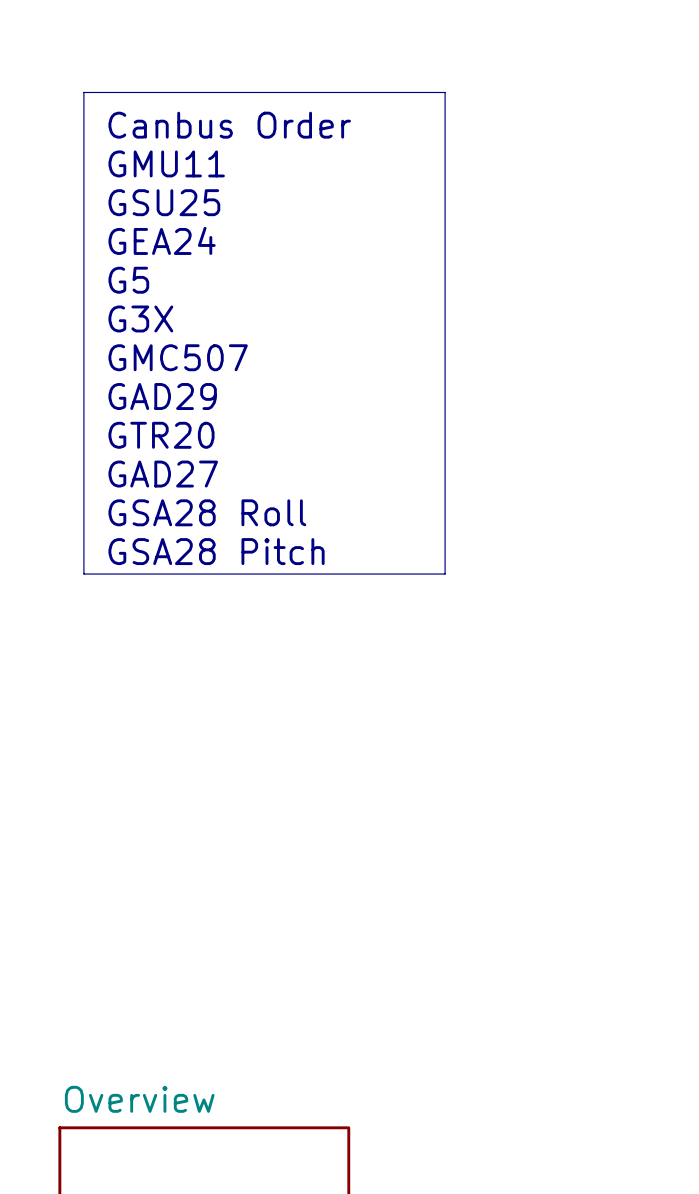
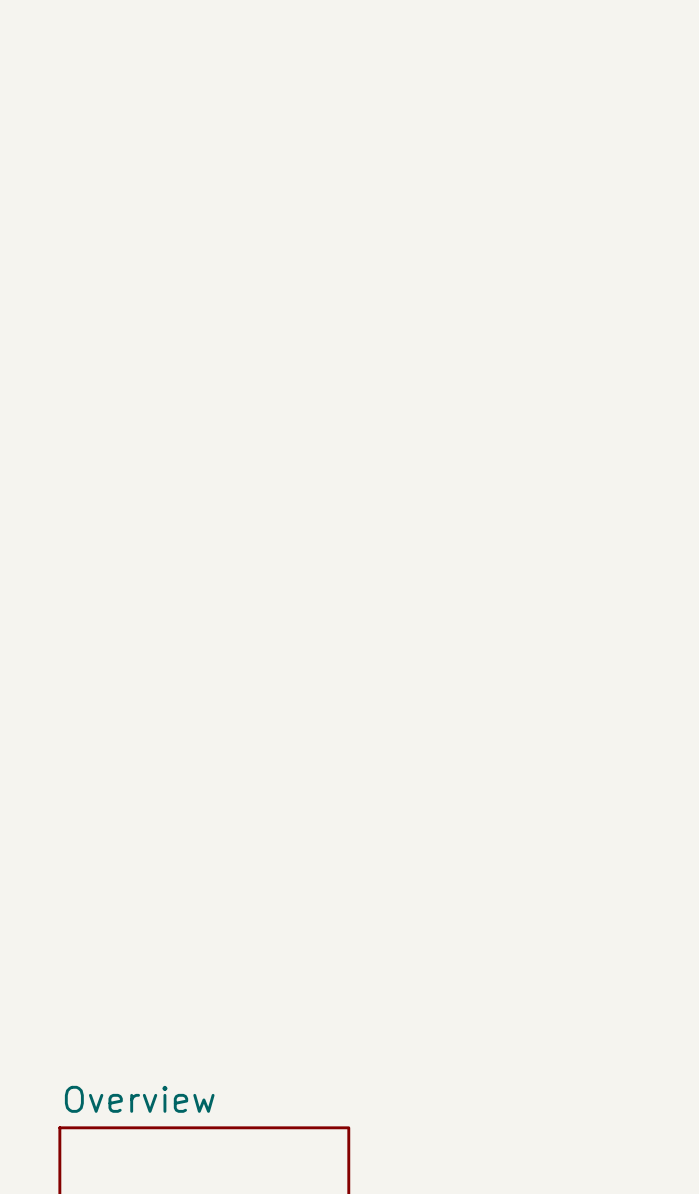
line: (83, 92) (445, 92) (445, 574) (83, 574) (83, 92) -> none
text: Canbus Order (229, 125) -> none
text: GMU11 (166, 163) -> none
text: GSU25 (164, 202) -> none
text: GEA24 (162, 240) -> none
text: G5 (128, 280) -> none
text: G3X (140, 318) -> none
text: GMC507 (178, 357) -> none
text: GAD29 (162, 396) -> none
text: GTR20 (161, 435) -> none
text: GAD27 (163, 474) -> none
text: GSA28 Roll (207, 512) -> none
text: GSA28 Pitch (216, 551) -> none

